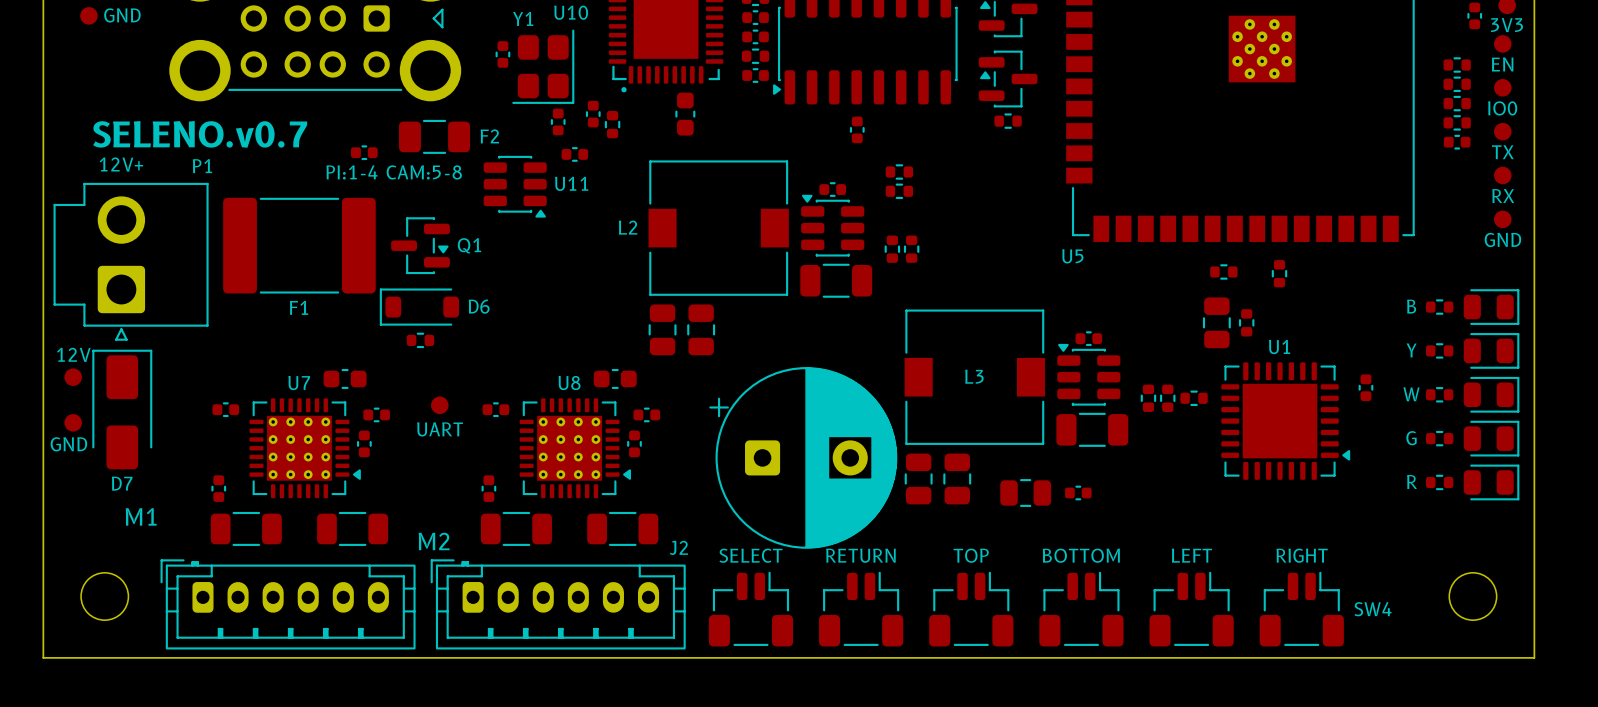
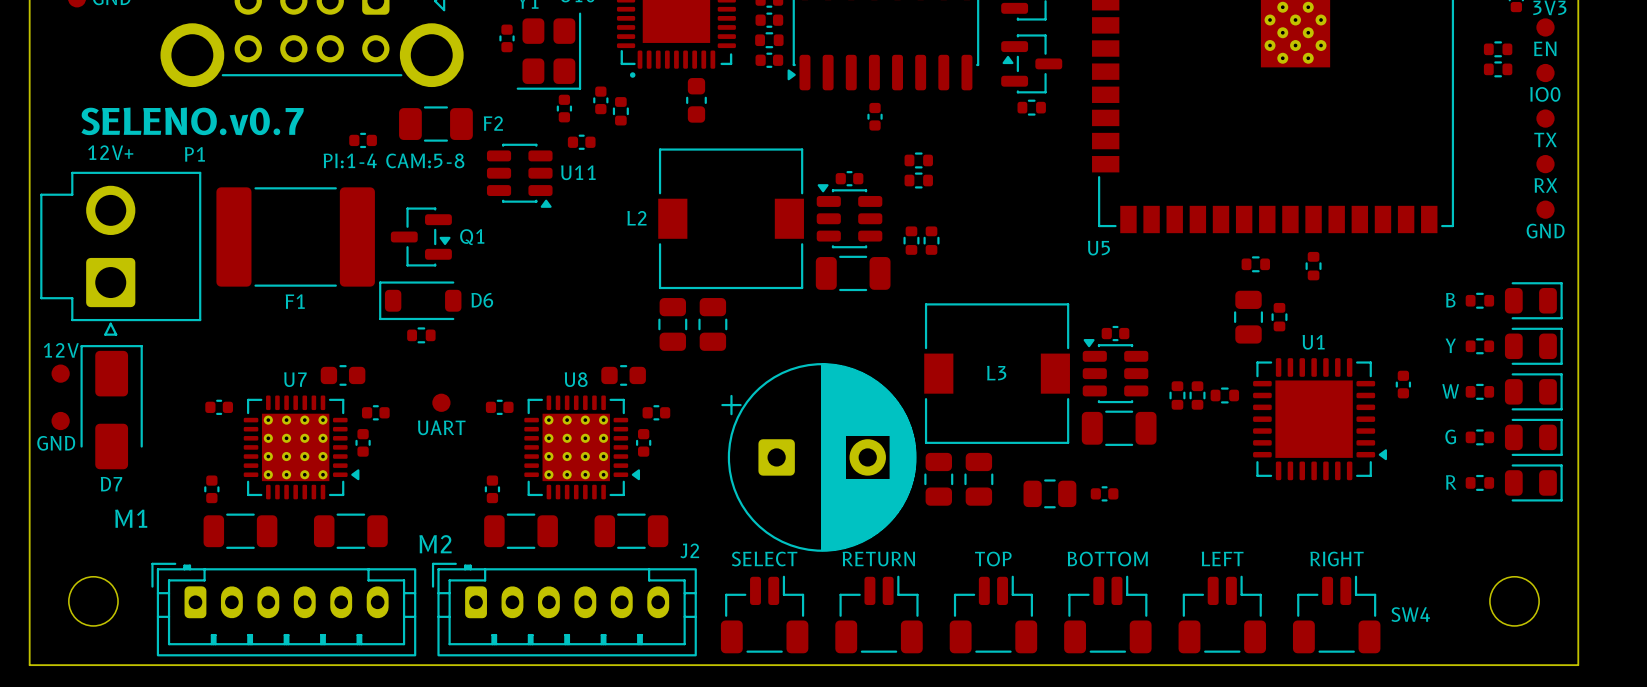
part: (1457, 103) -> none
part: (1457, 122) -> none
part: (1457, 142) -> none

